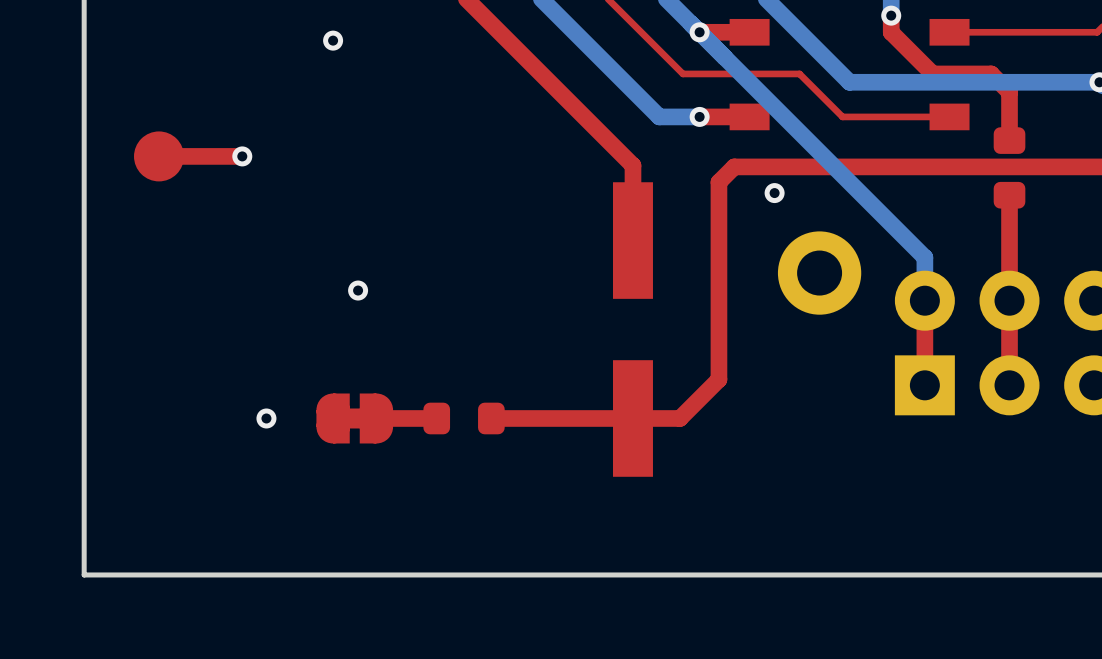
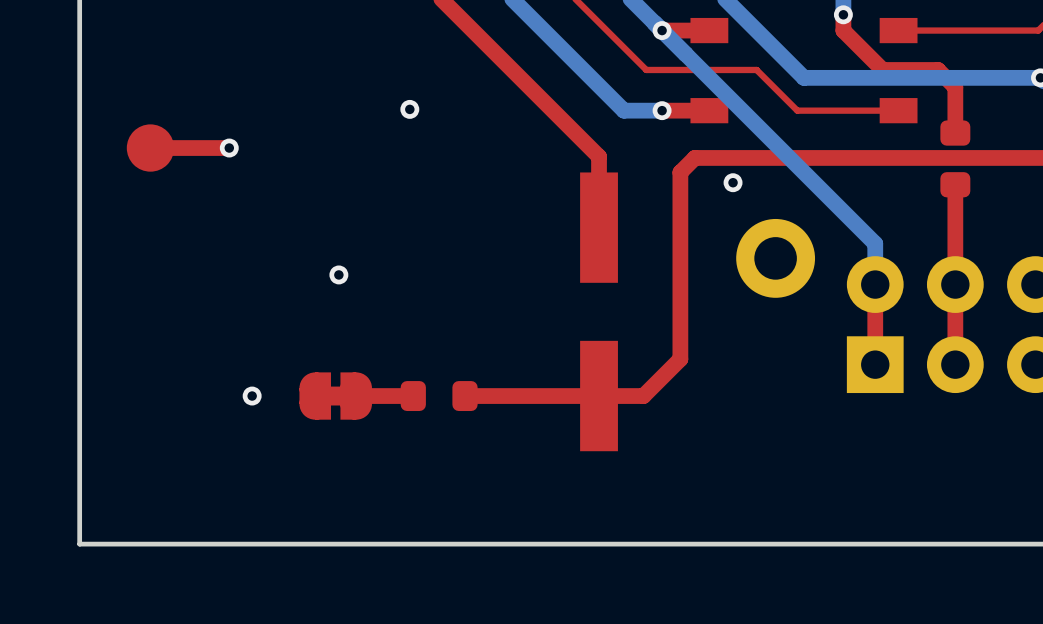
via: (333, 40) -> none
via: none -> (409, 109)

